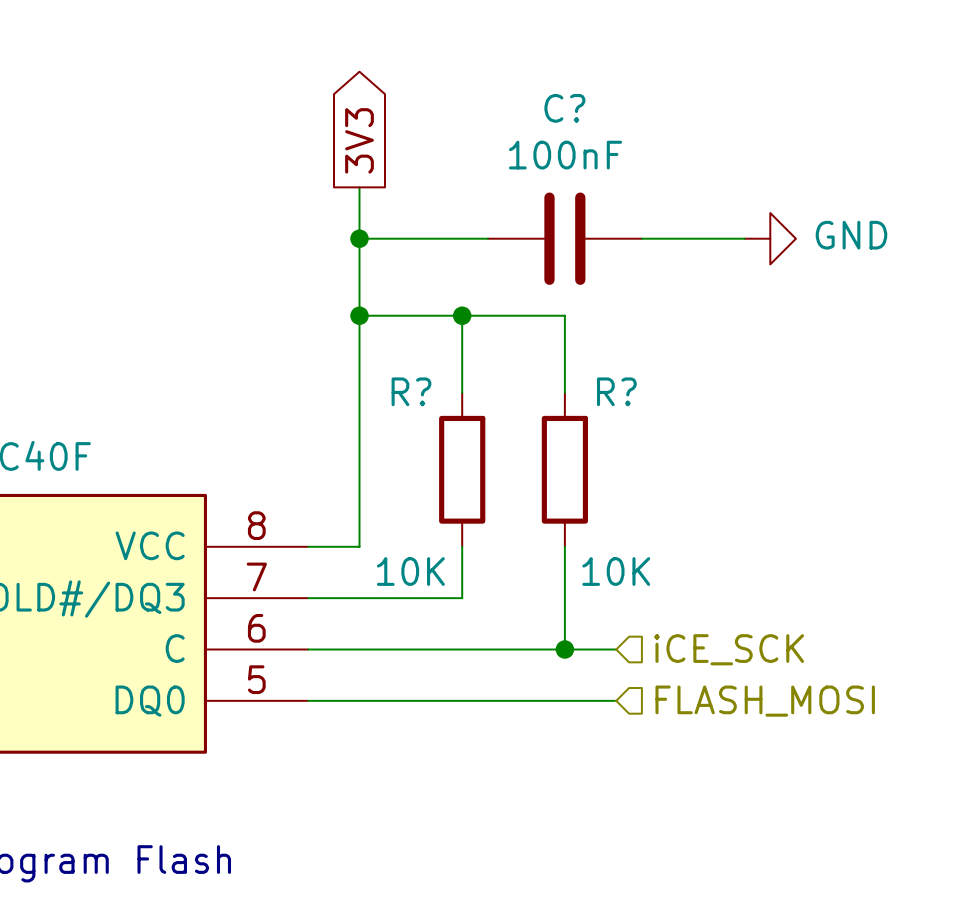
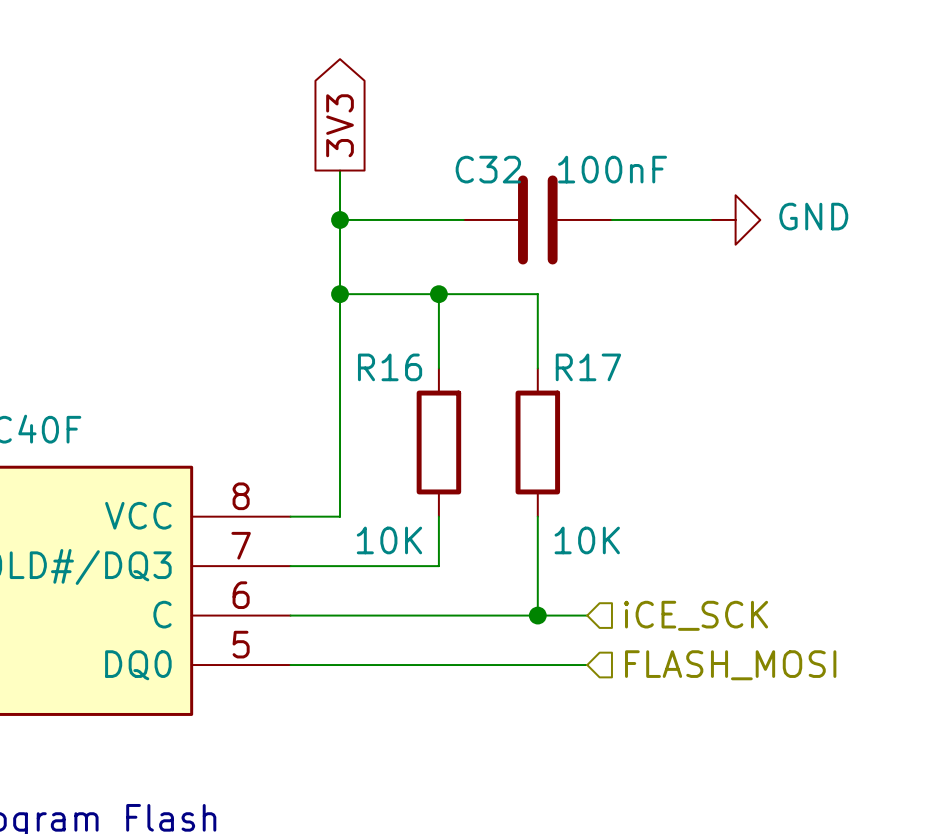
C? name: C? (564, 108) -> C32 (488, 169)
C? value position: 100nF (565, 155) -> 100nF (612, 169)
R? name: R? (411, 391) -> R16 (390, 367)
R? name: R? (616, 391) -> R17 (588, 367)

